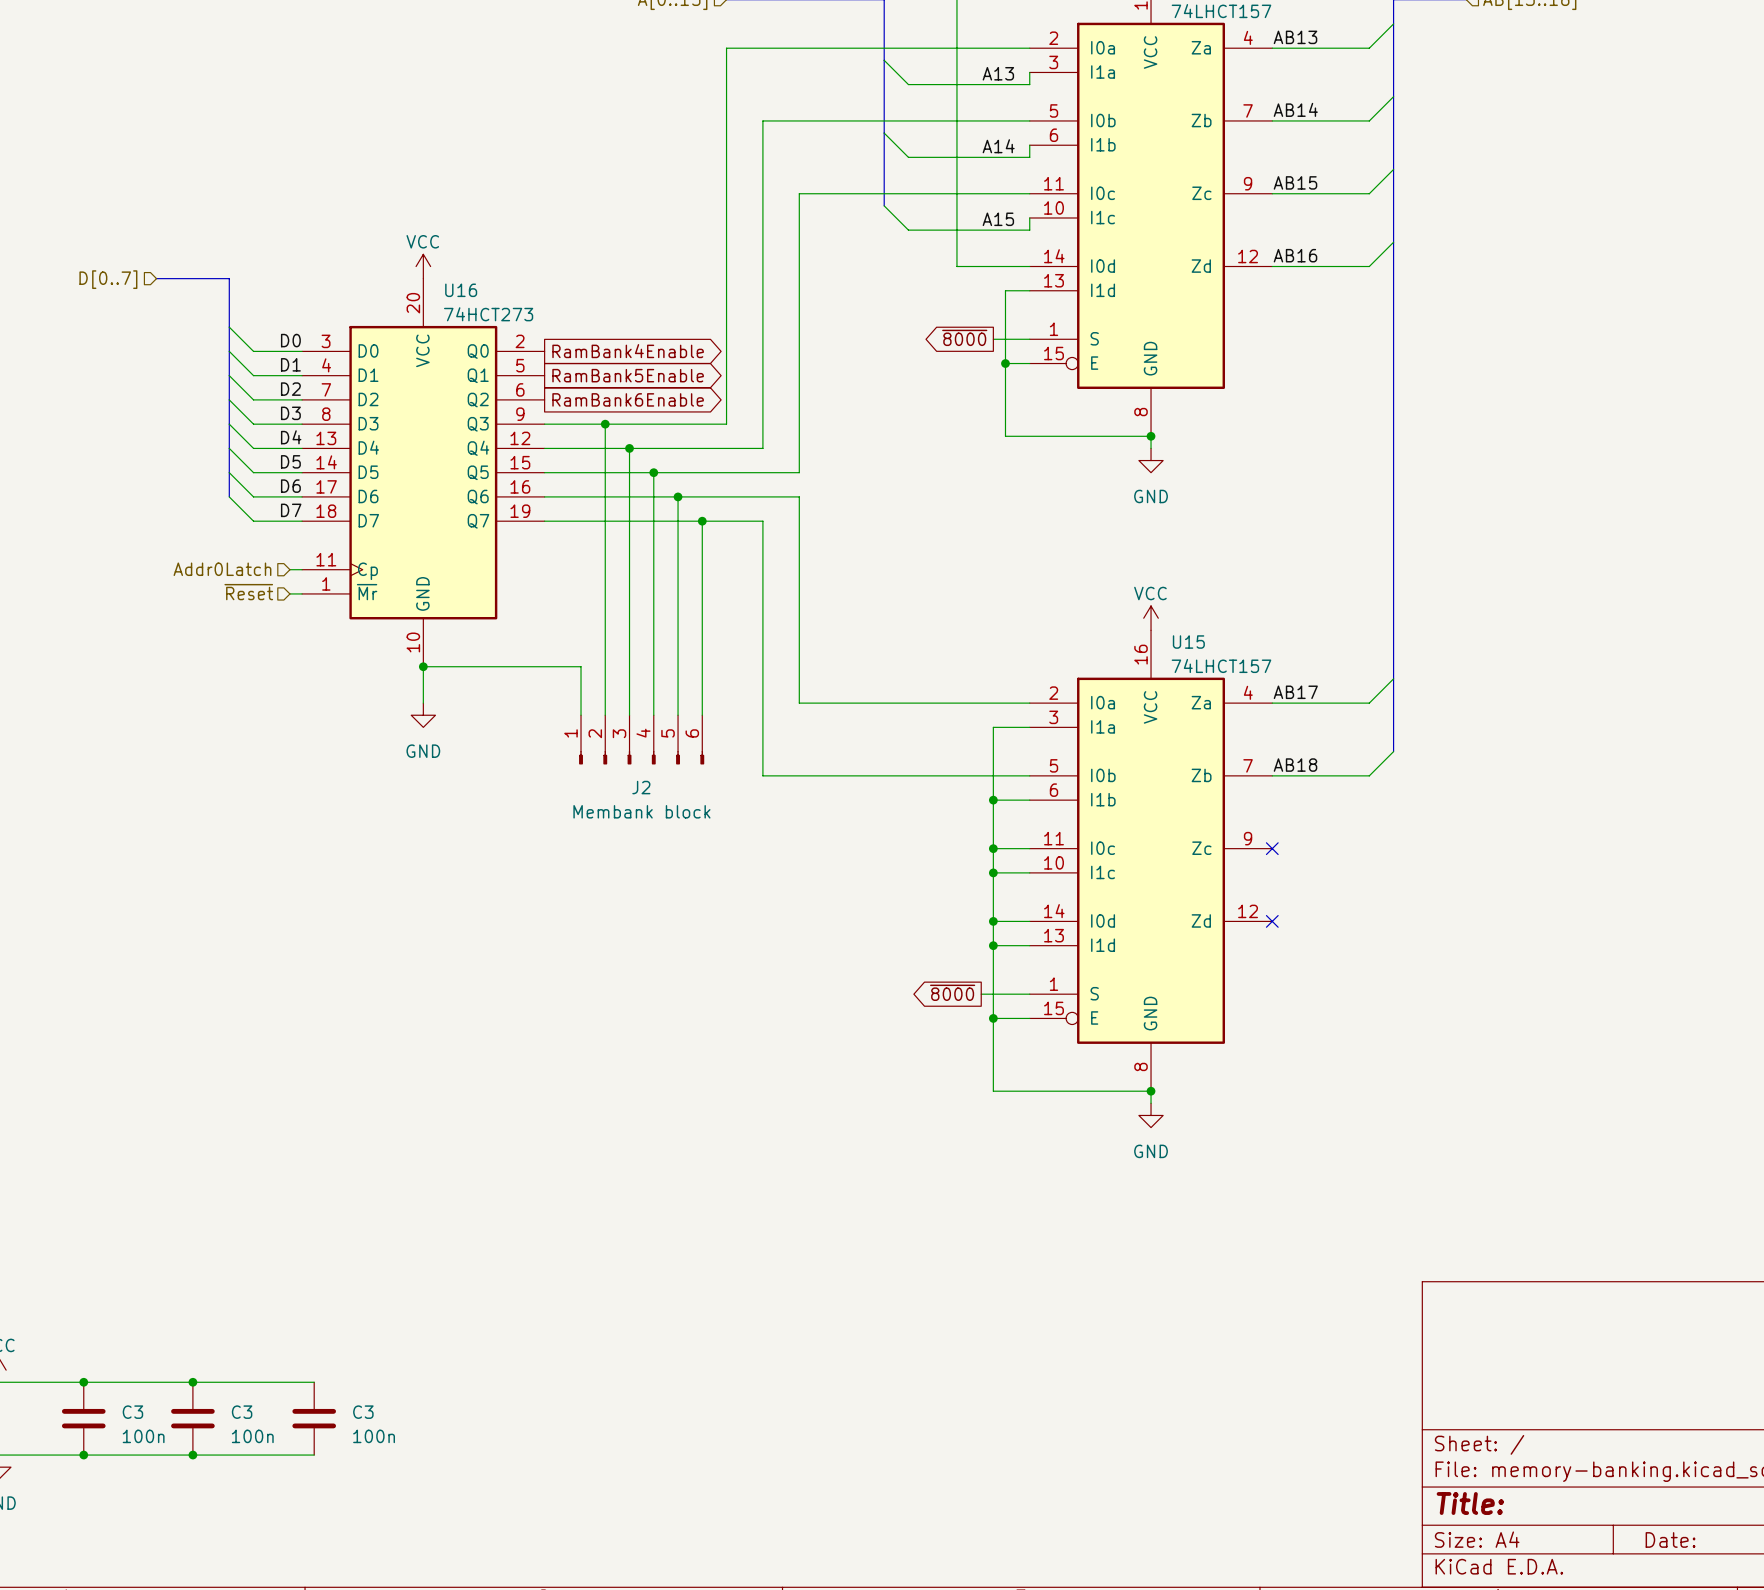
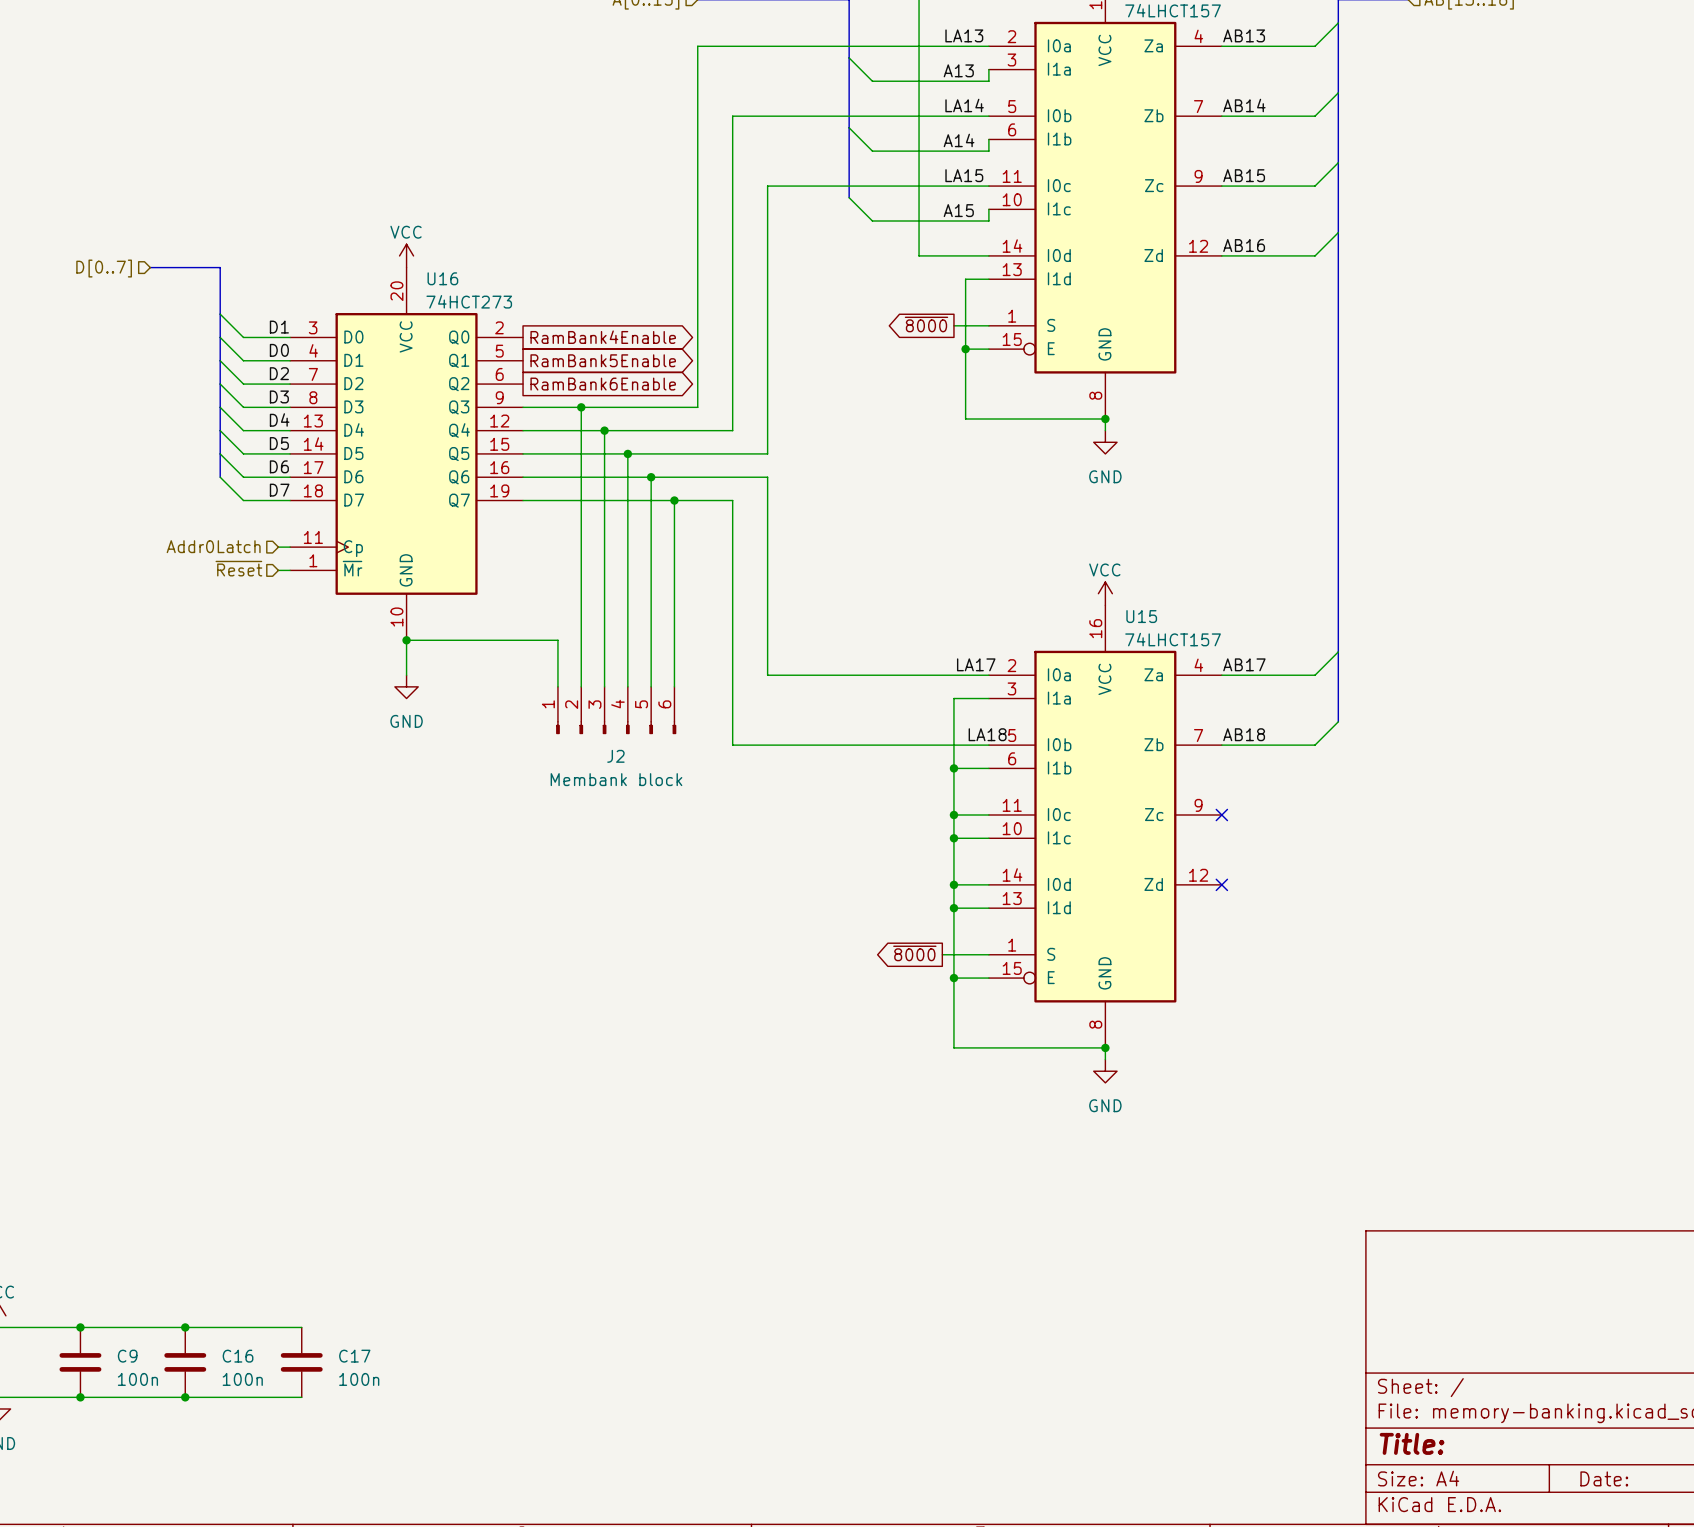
label: none -> LA13 (964, 35)
label: none -> LA14 (964, 105)
label: none -> LA15 (964, 175)
label: D0 (290, 340) -> D1 (279, 327)
label: D1 (290, 364) -> D0 (279, 350)
label: none -> LA17 (976, 664)
label: none -> LA18 (987, 734)
C3 name: C3 (132, 1412) -> C9 (127, 1356)
C3 name: C3 (242, 1412) -> C16 (238, 1356)
C3 name: C3 (363, 1412) -> C17 (354, 1356)

